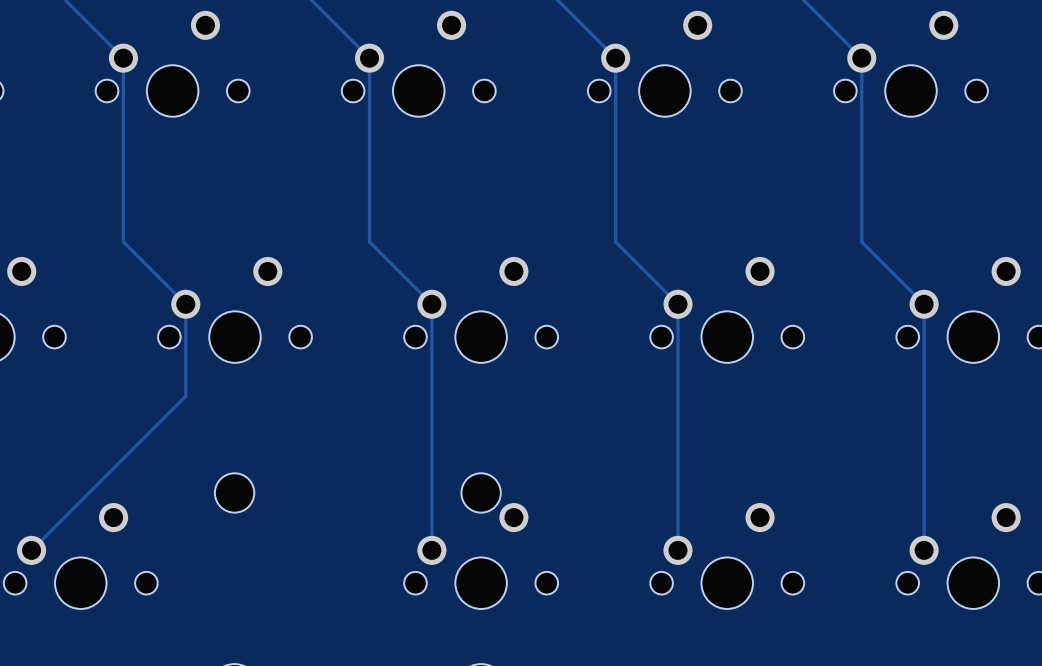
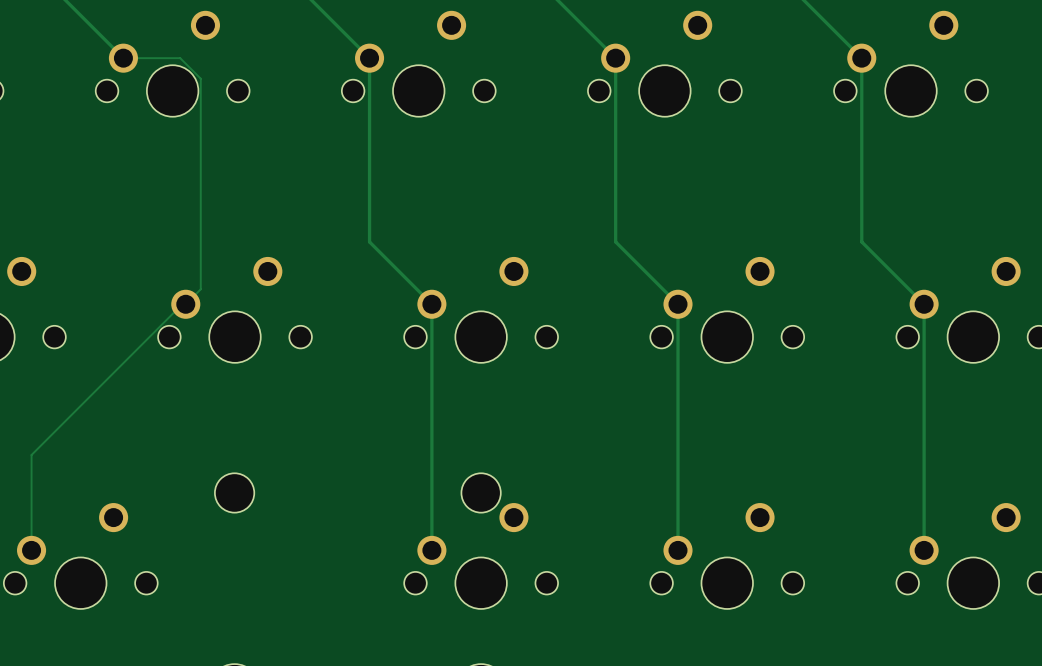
track: (123, 58) (123, 241) (185, 304) (185, 396) (31, 550) -> (123, 58) (180, 58) (200, 78) (200, 289) (185, 304) (182, 304) (31, 454) (31, 550)

